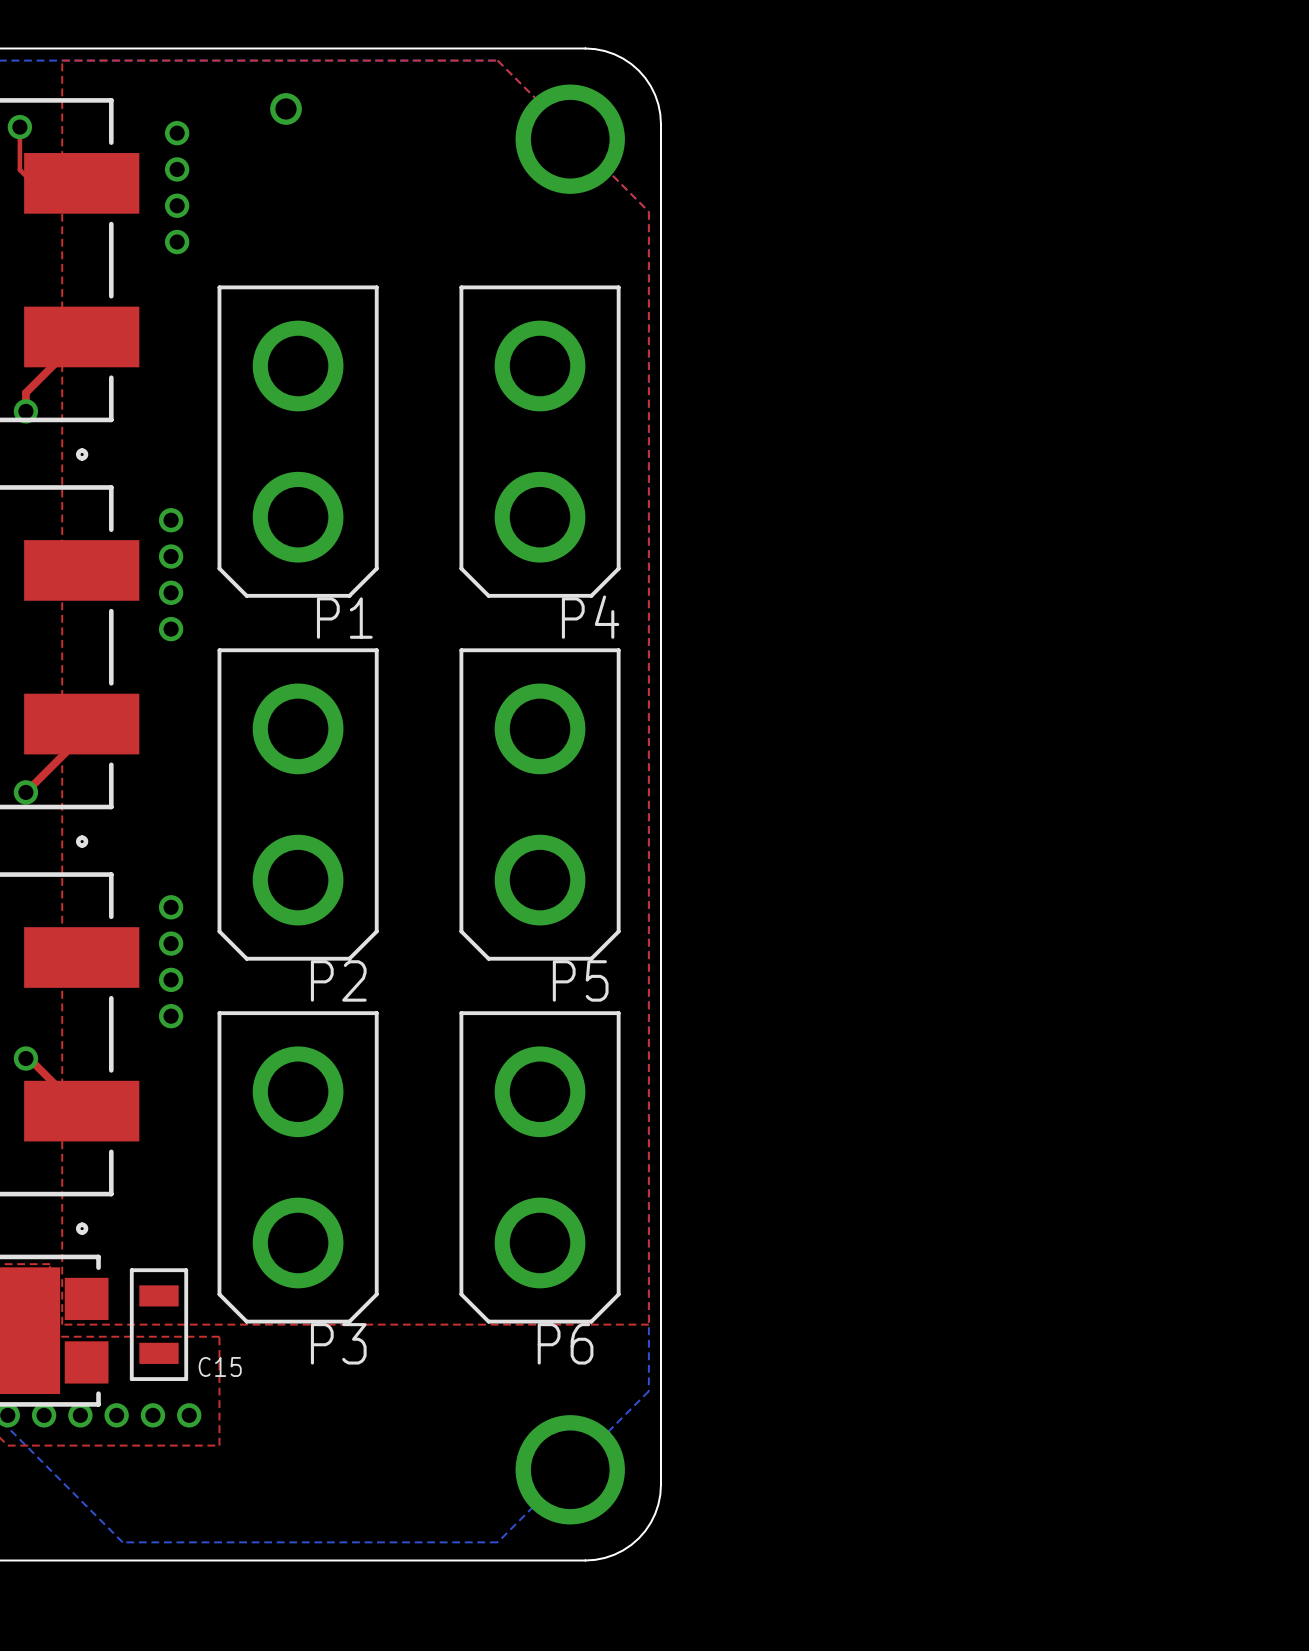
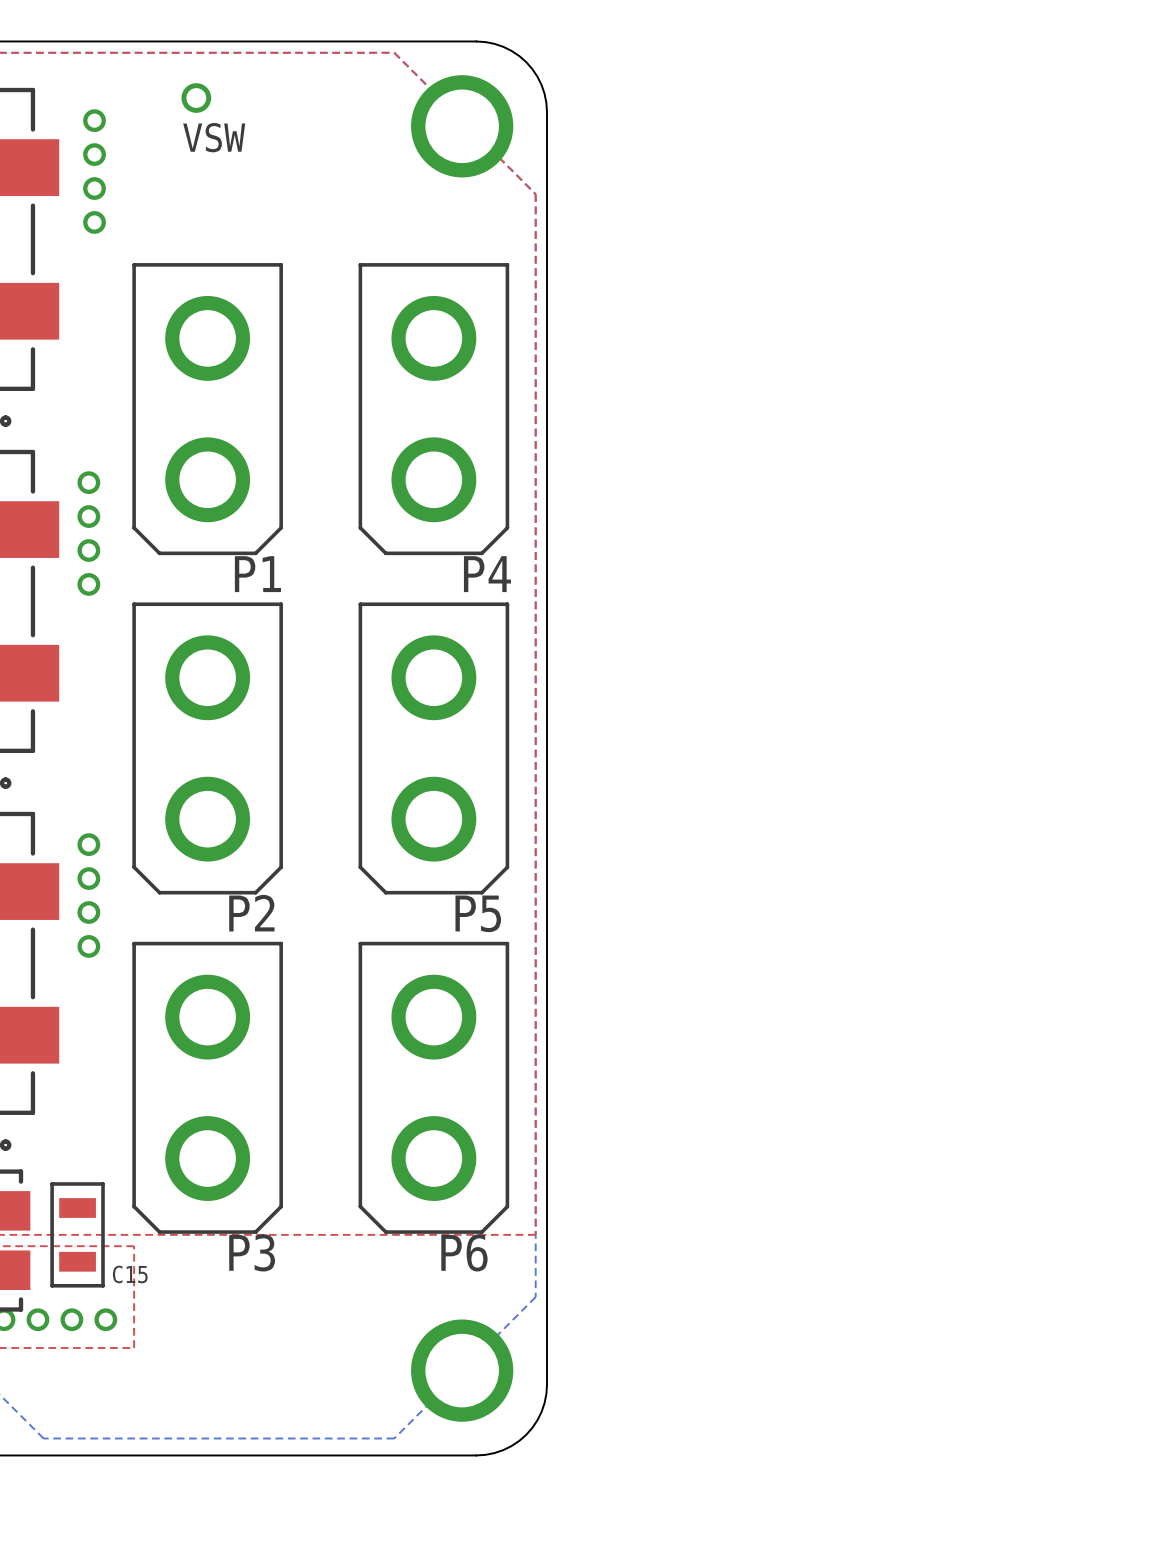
text: none -> VSW (214, 137)

